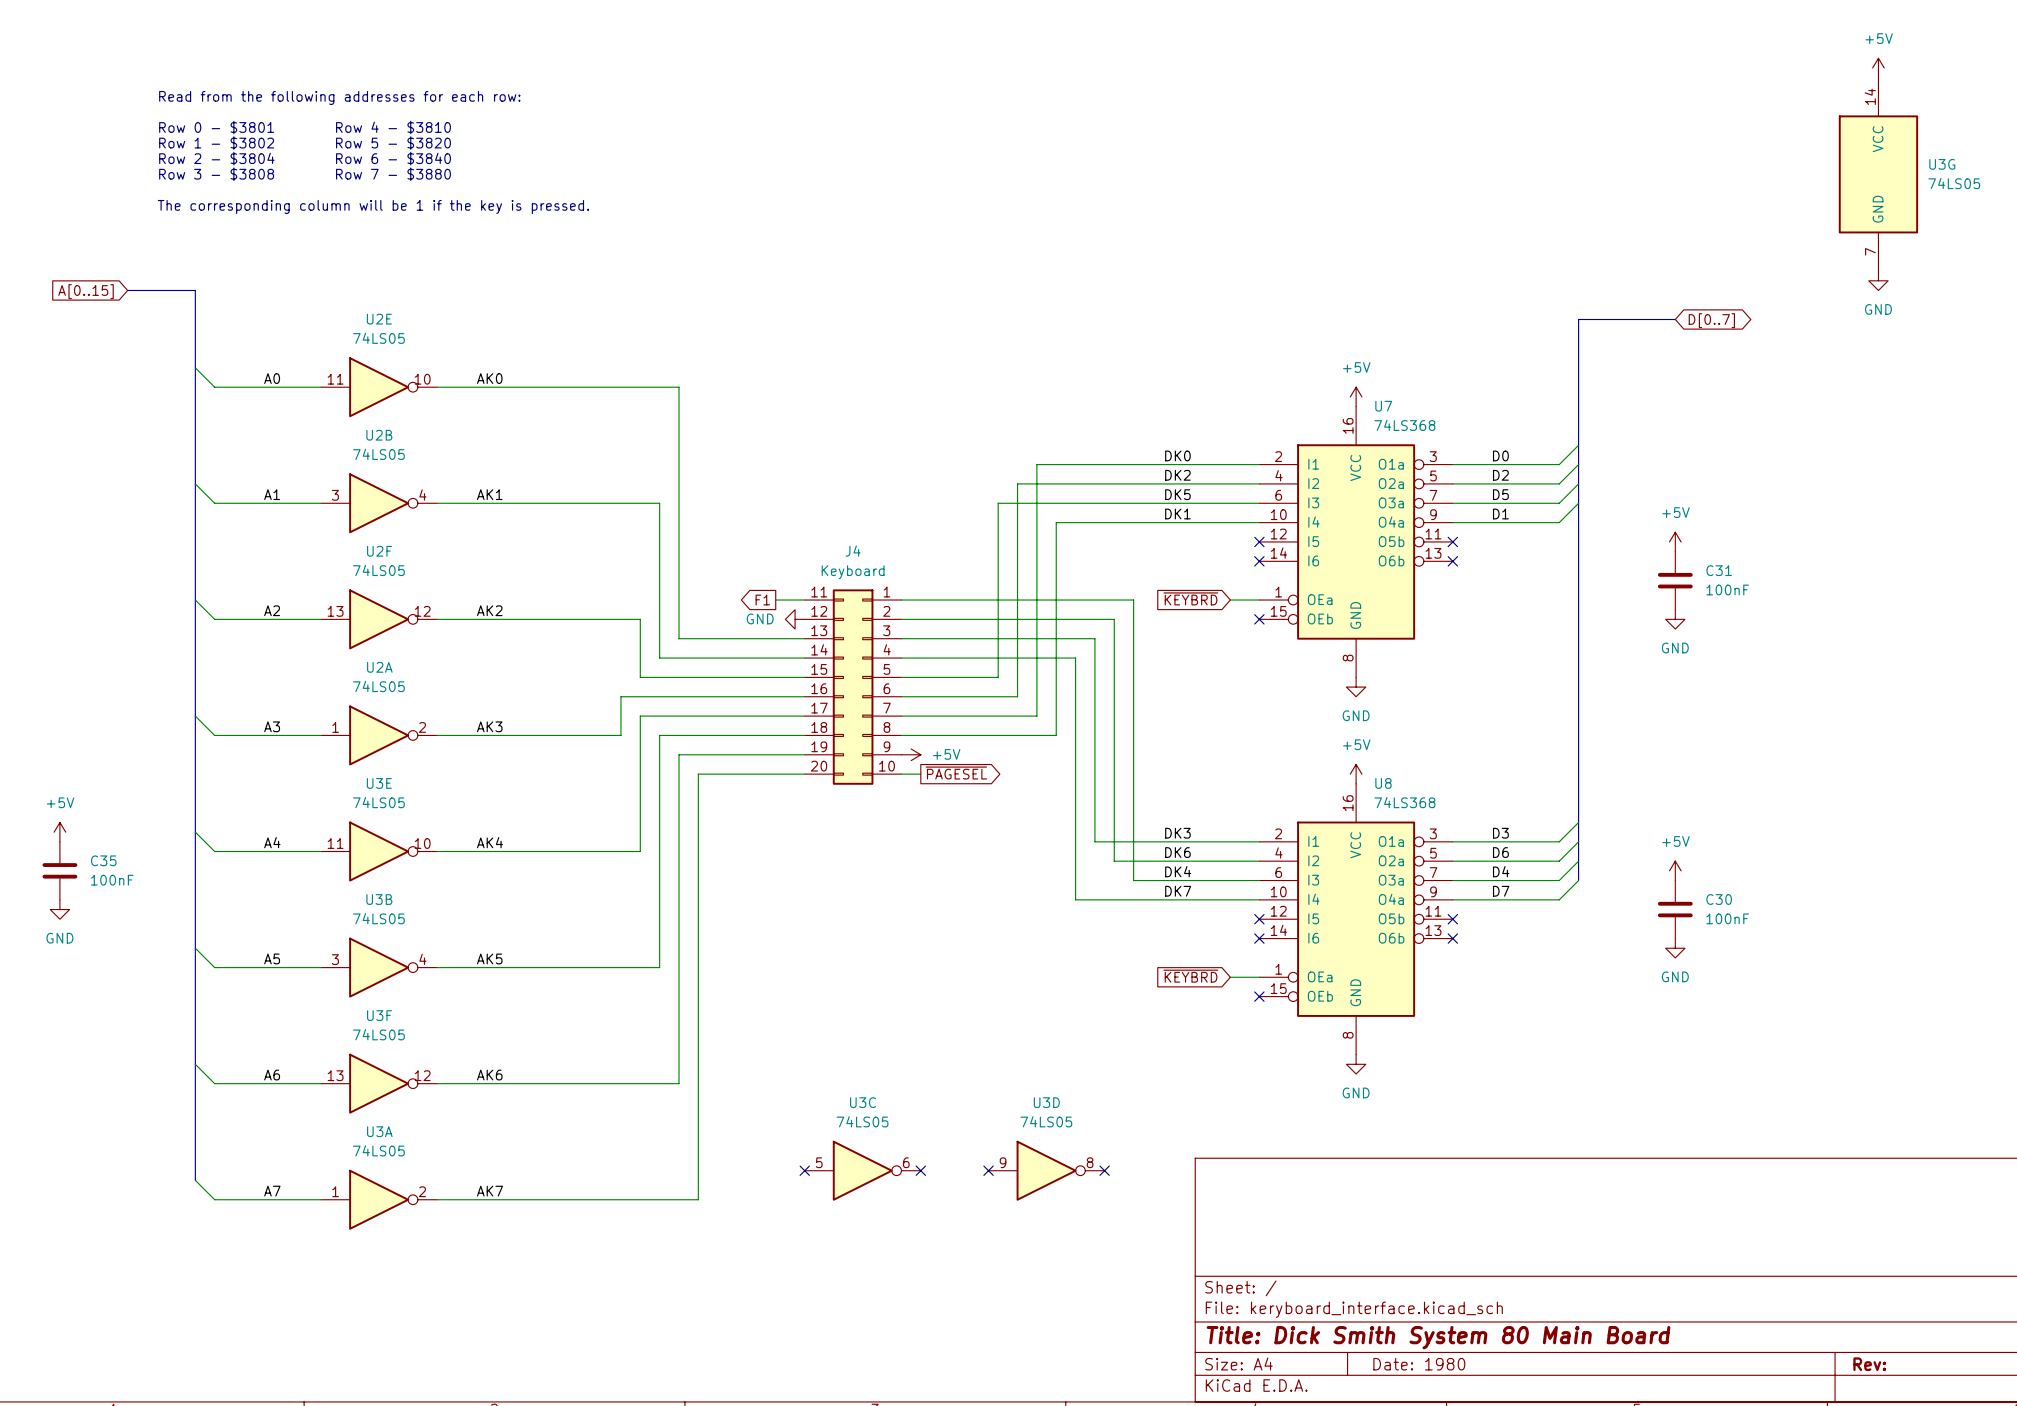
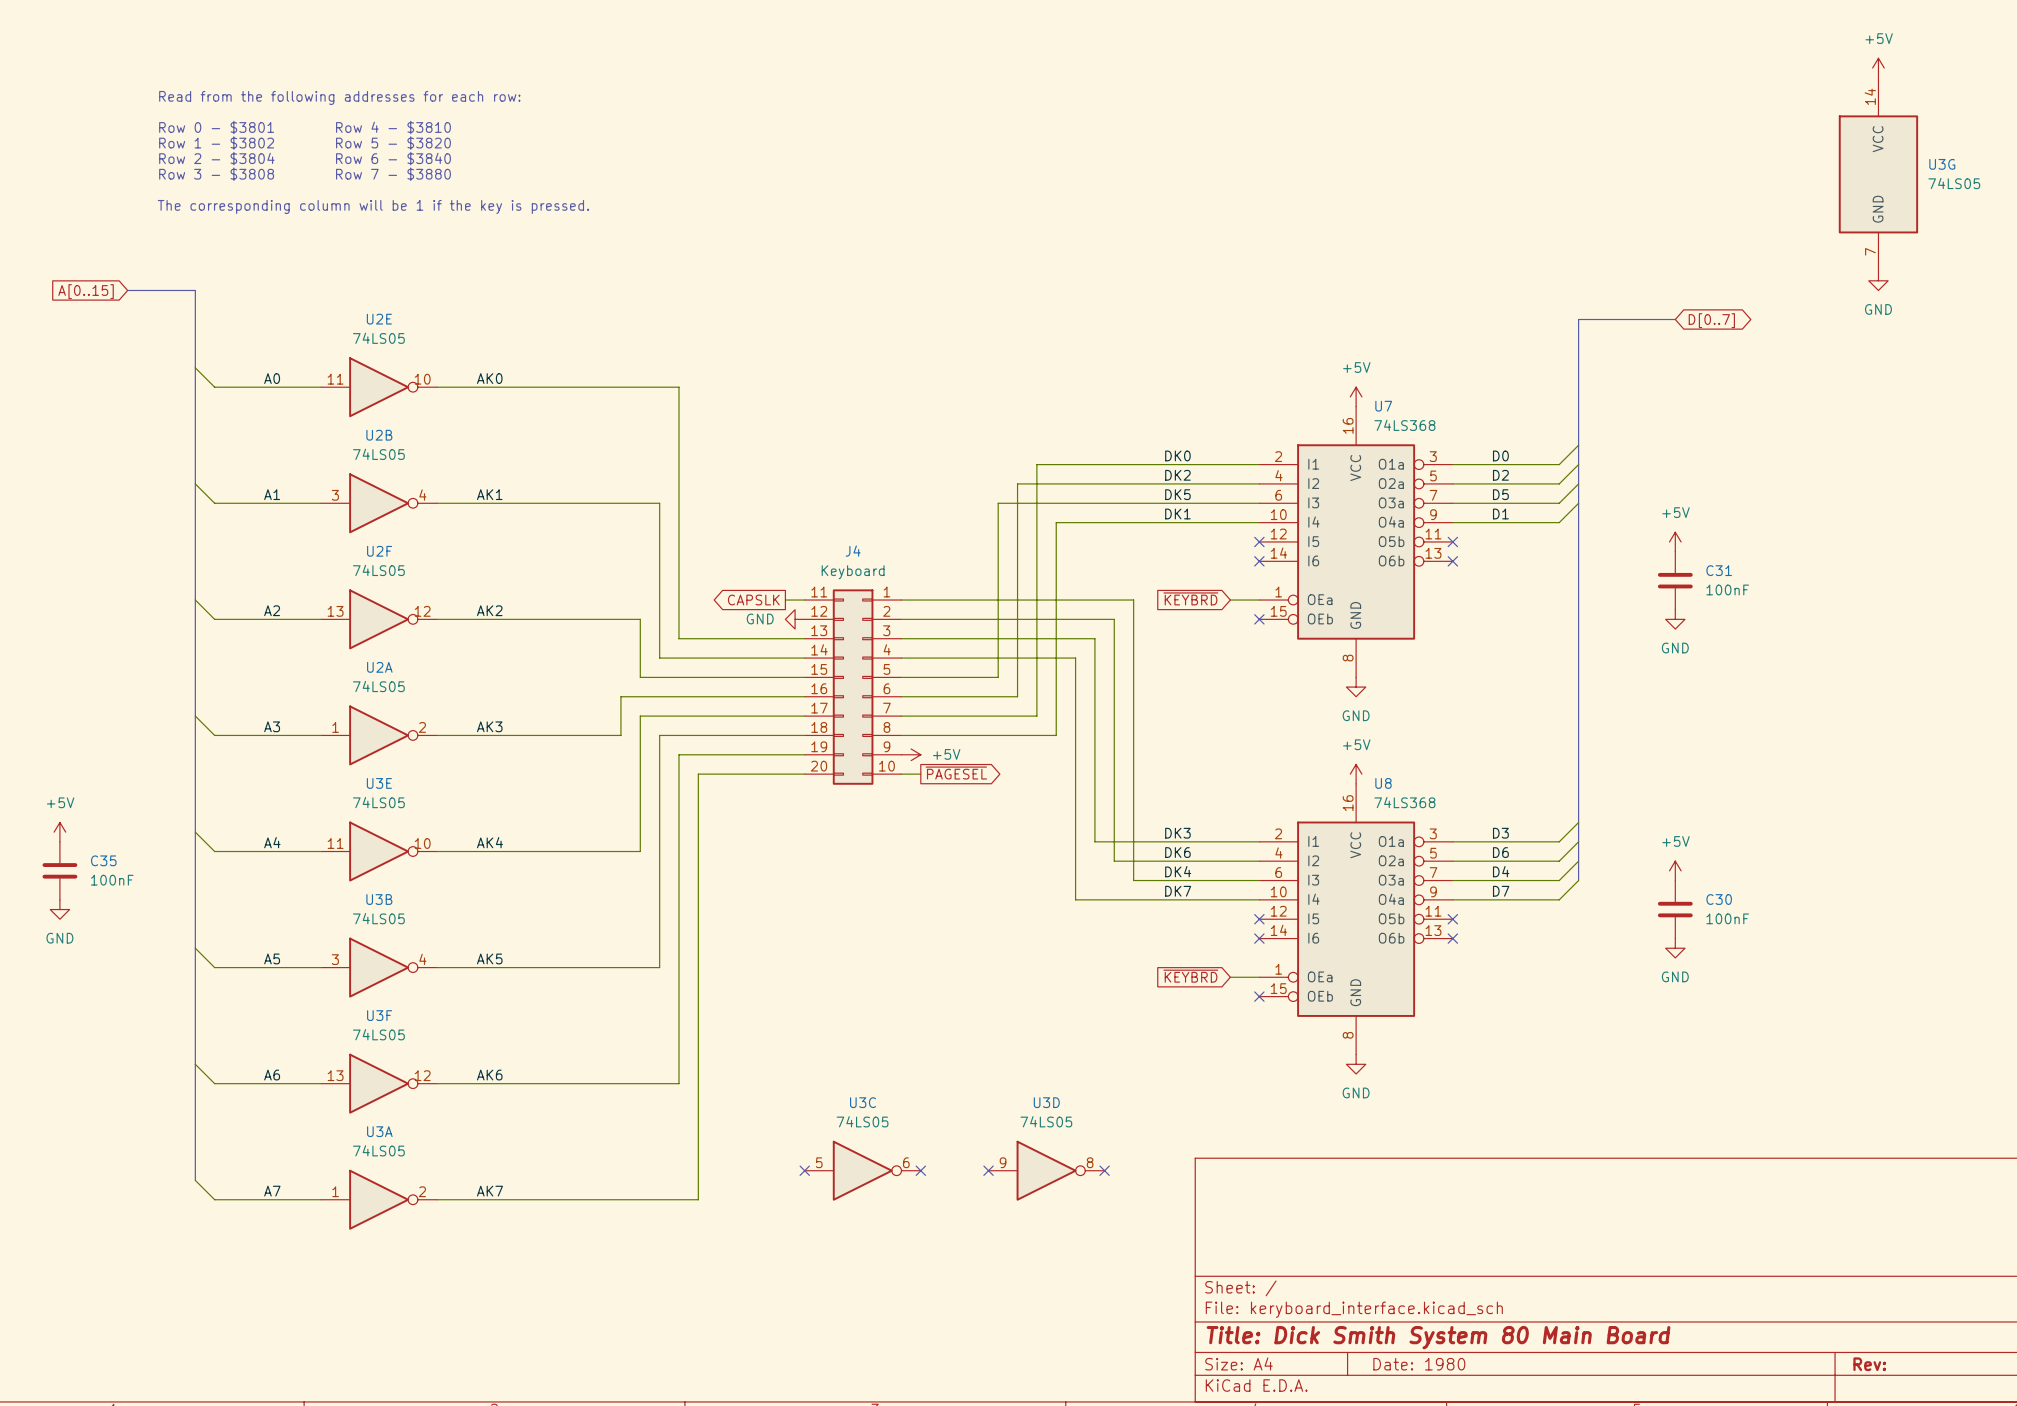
global label: none -> CAPSLK (753, 600)
global label: F1 (762, 600) -> none
wire: (775, 600) (785, 600) -> none

